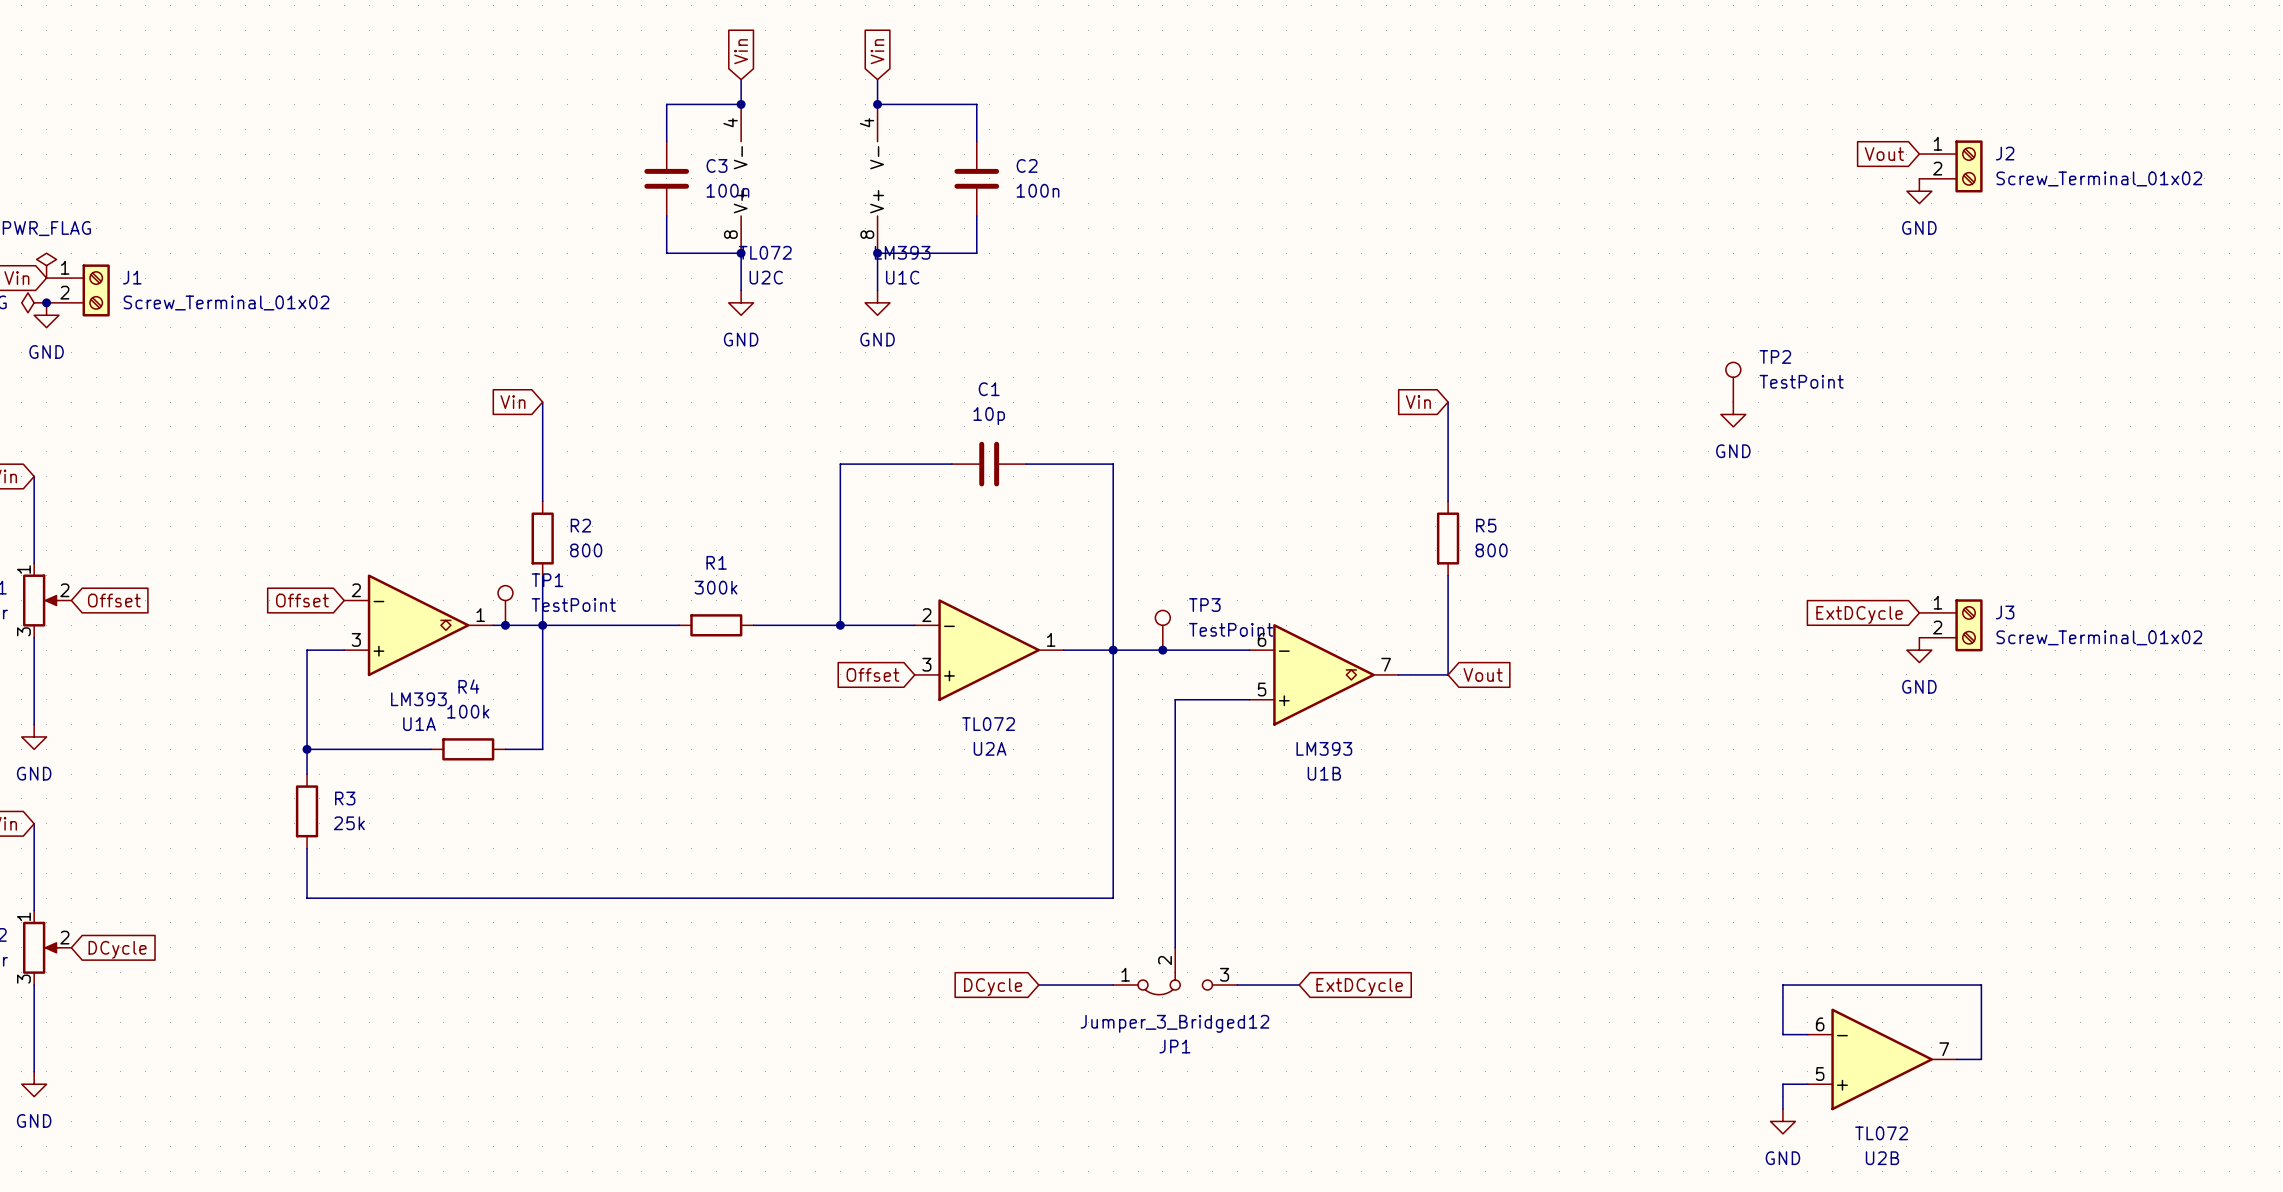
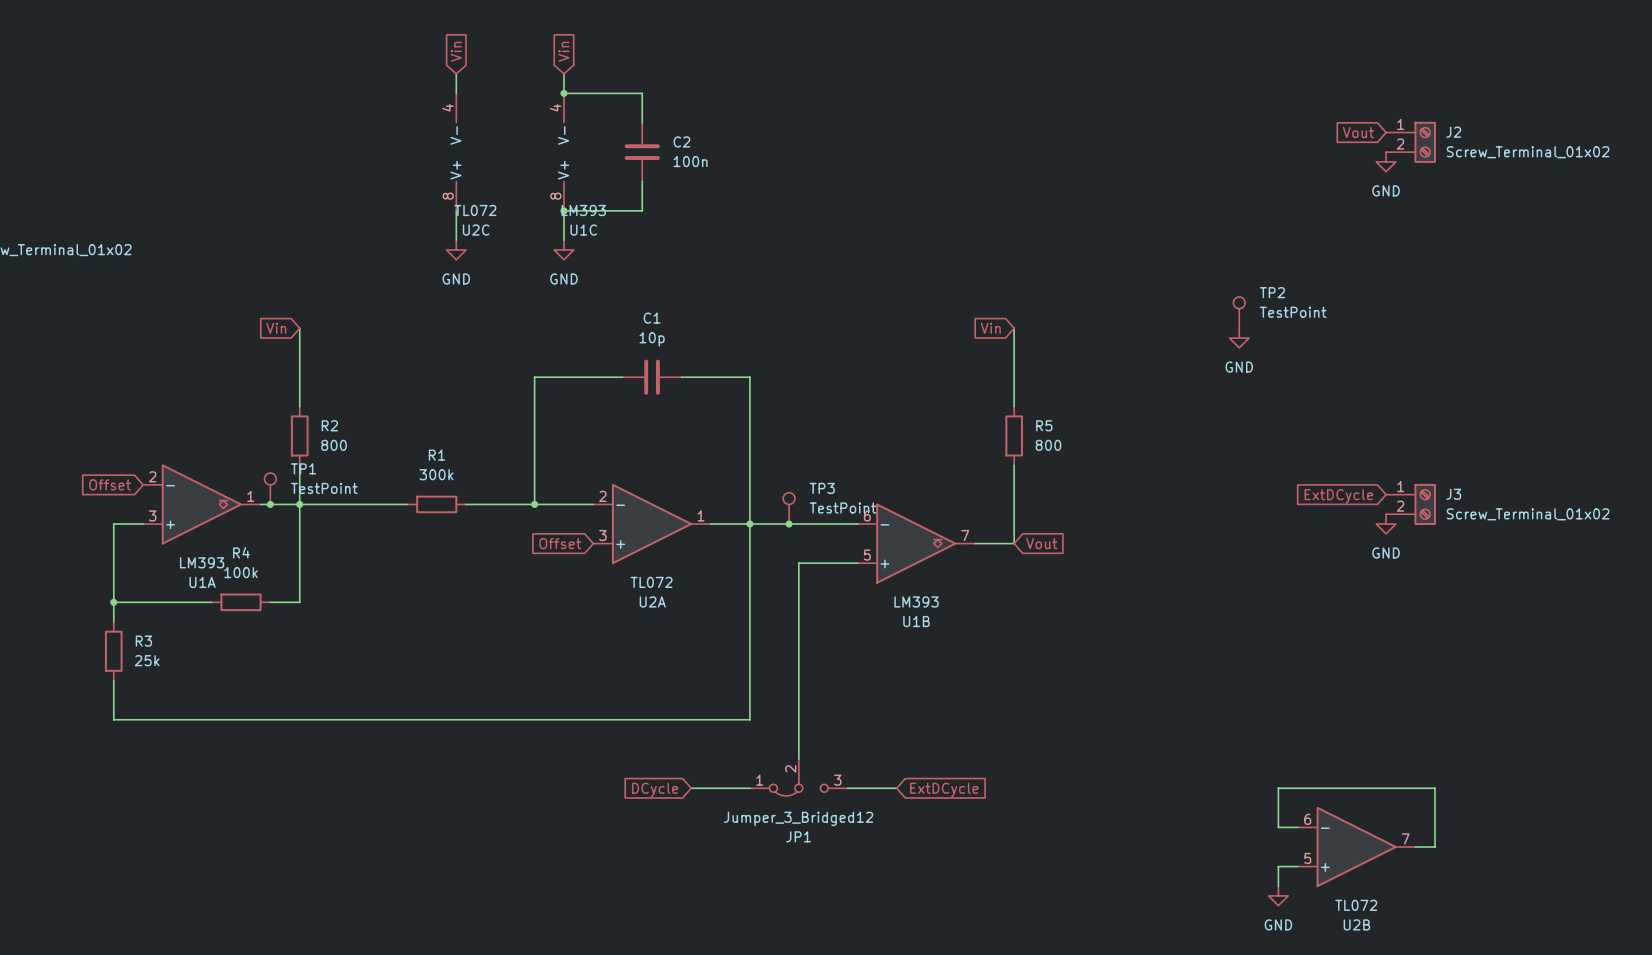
wire: (741, 104) (666, 104) (666, 141) -> none
junction: (741, 104) -> none
C3: 100n (666, 178) -> none
wire: (666, 216) (666, 253) (741, 253) -> none
junction: (741, 253) -> none

